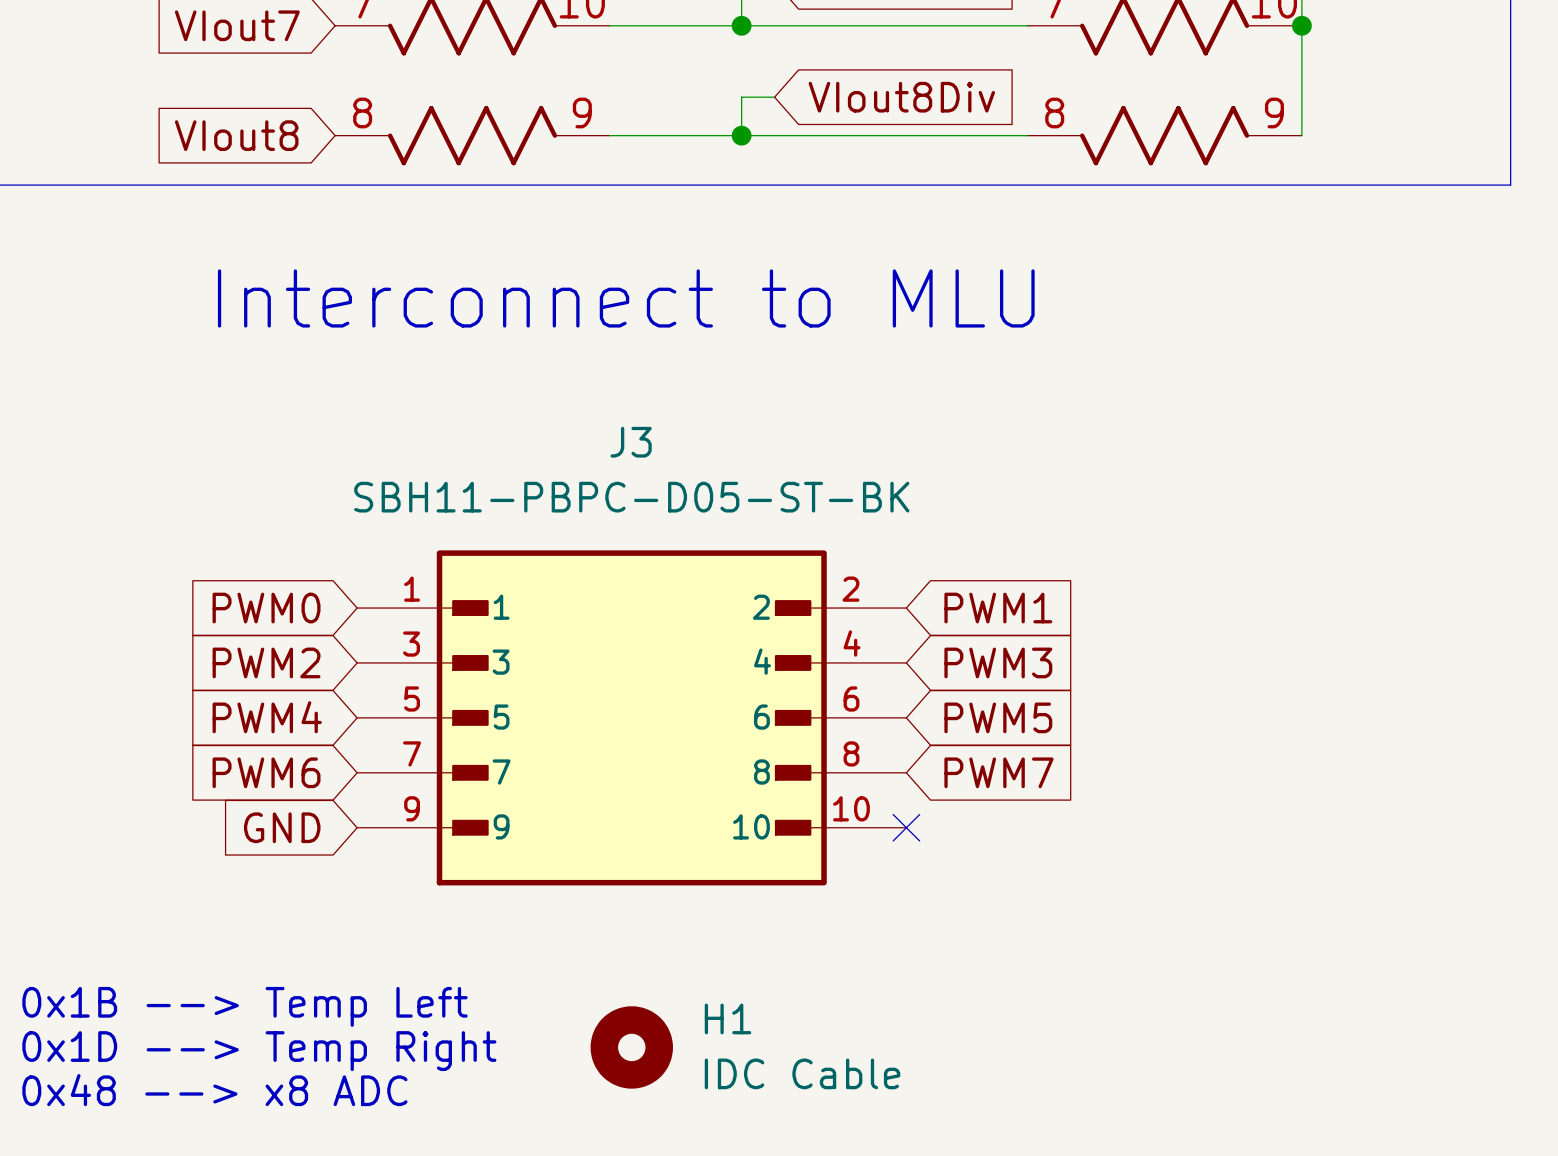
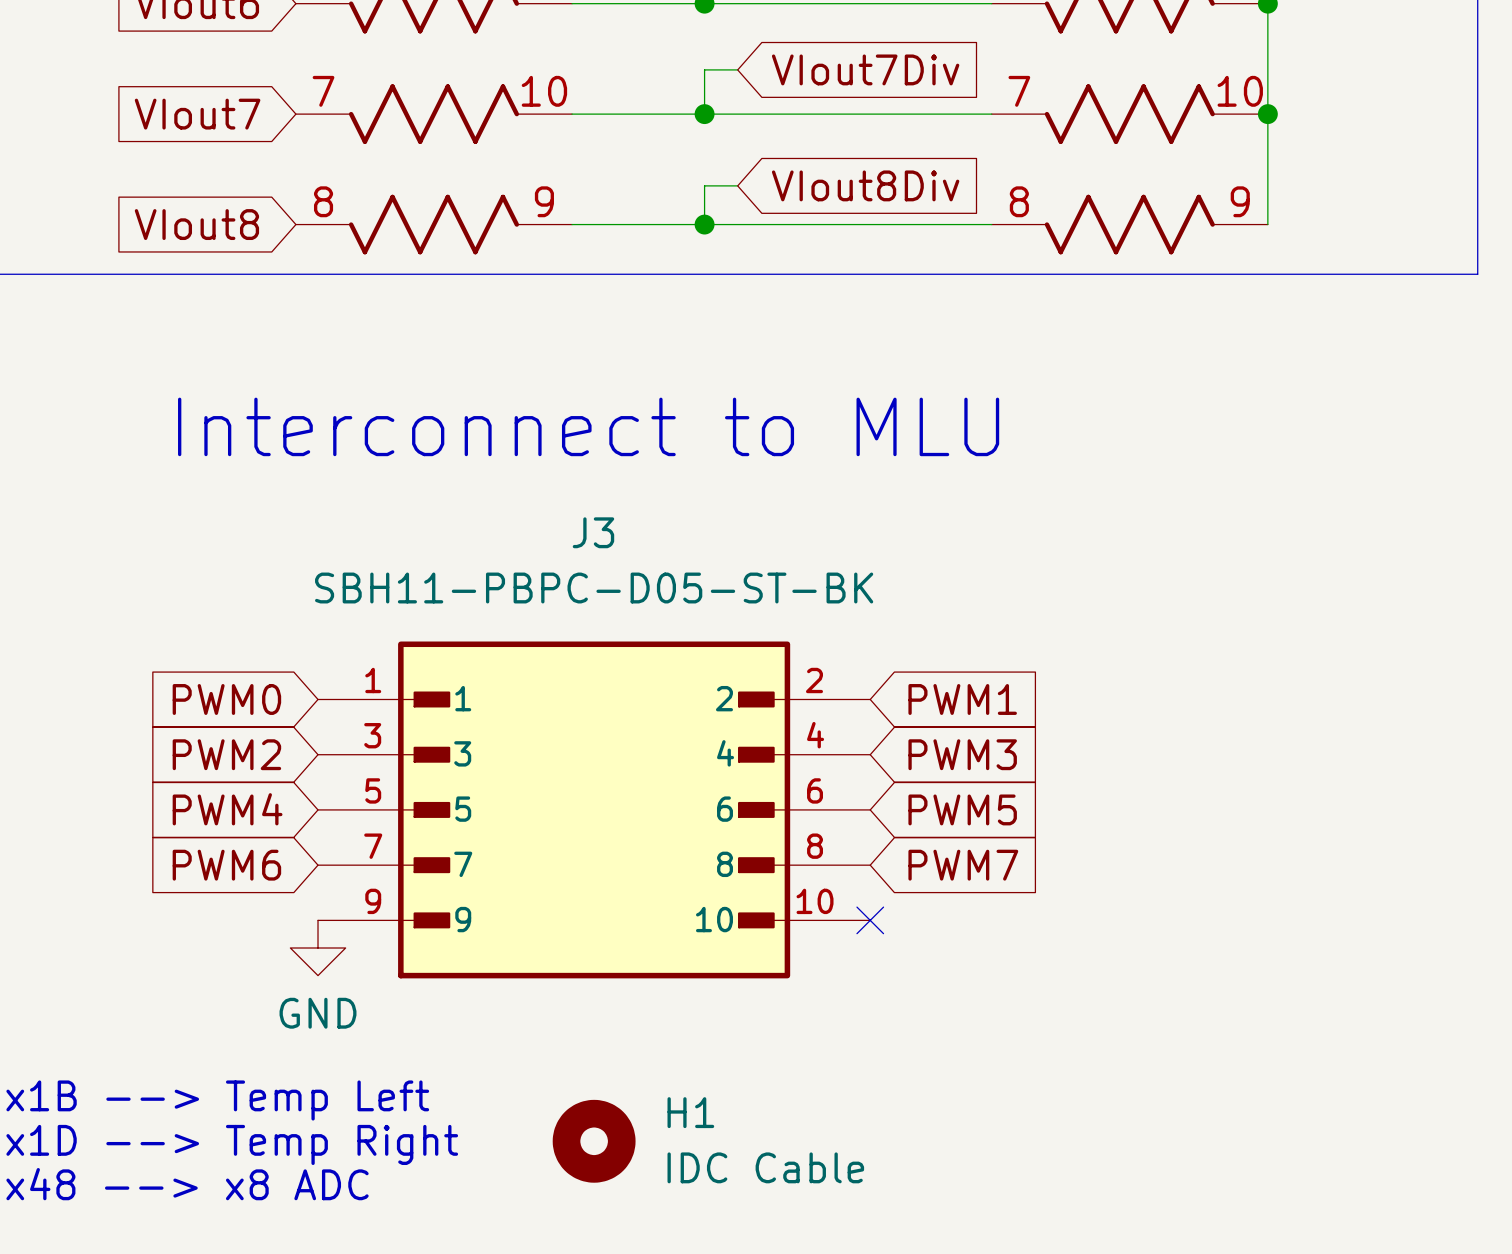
text position: Interconnect to MLU (626, 298) -> Interconnect to MLU (588, 426)
global label: GND (282, 827) -> none
power symbol: none -> GND (318, 948)

